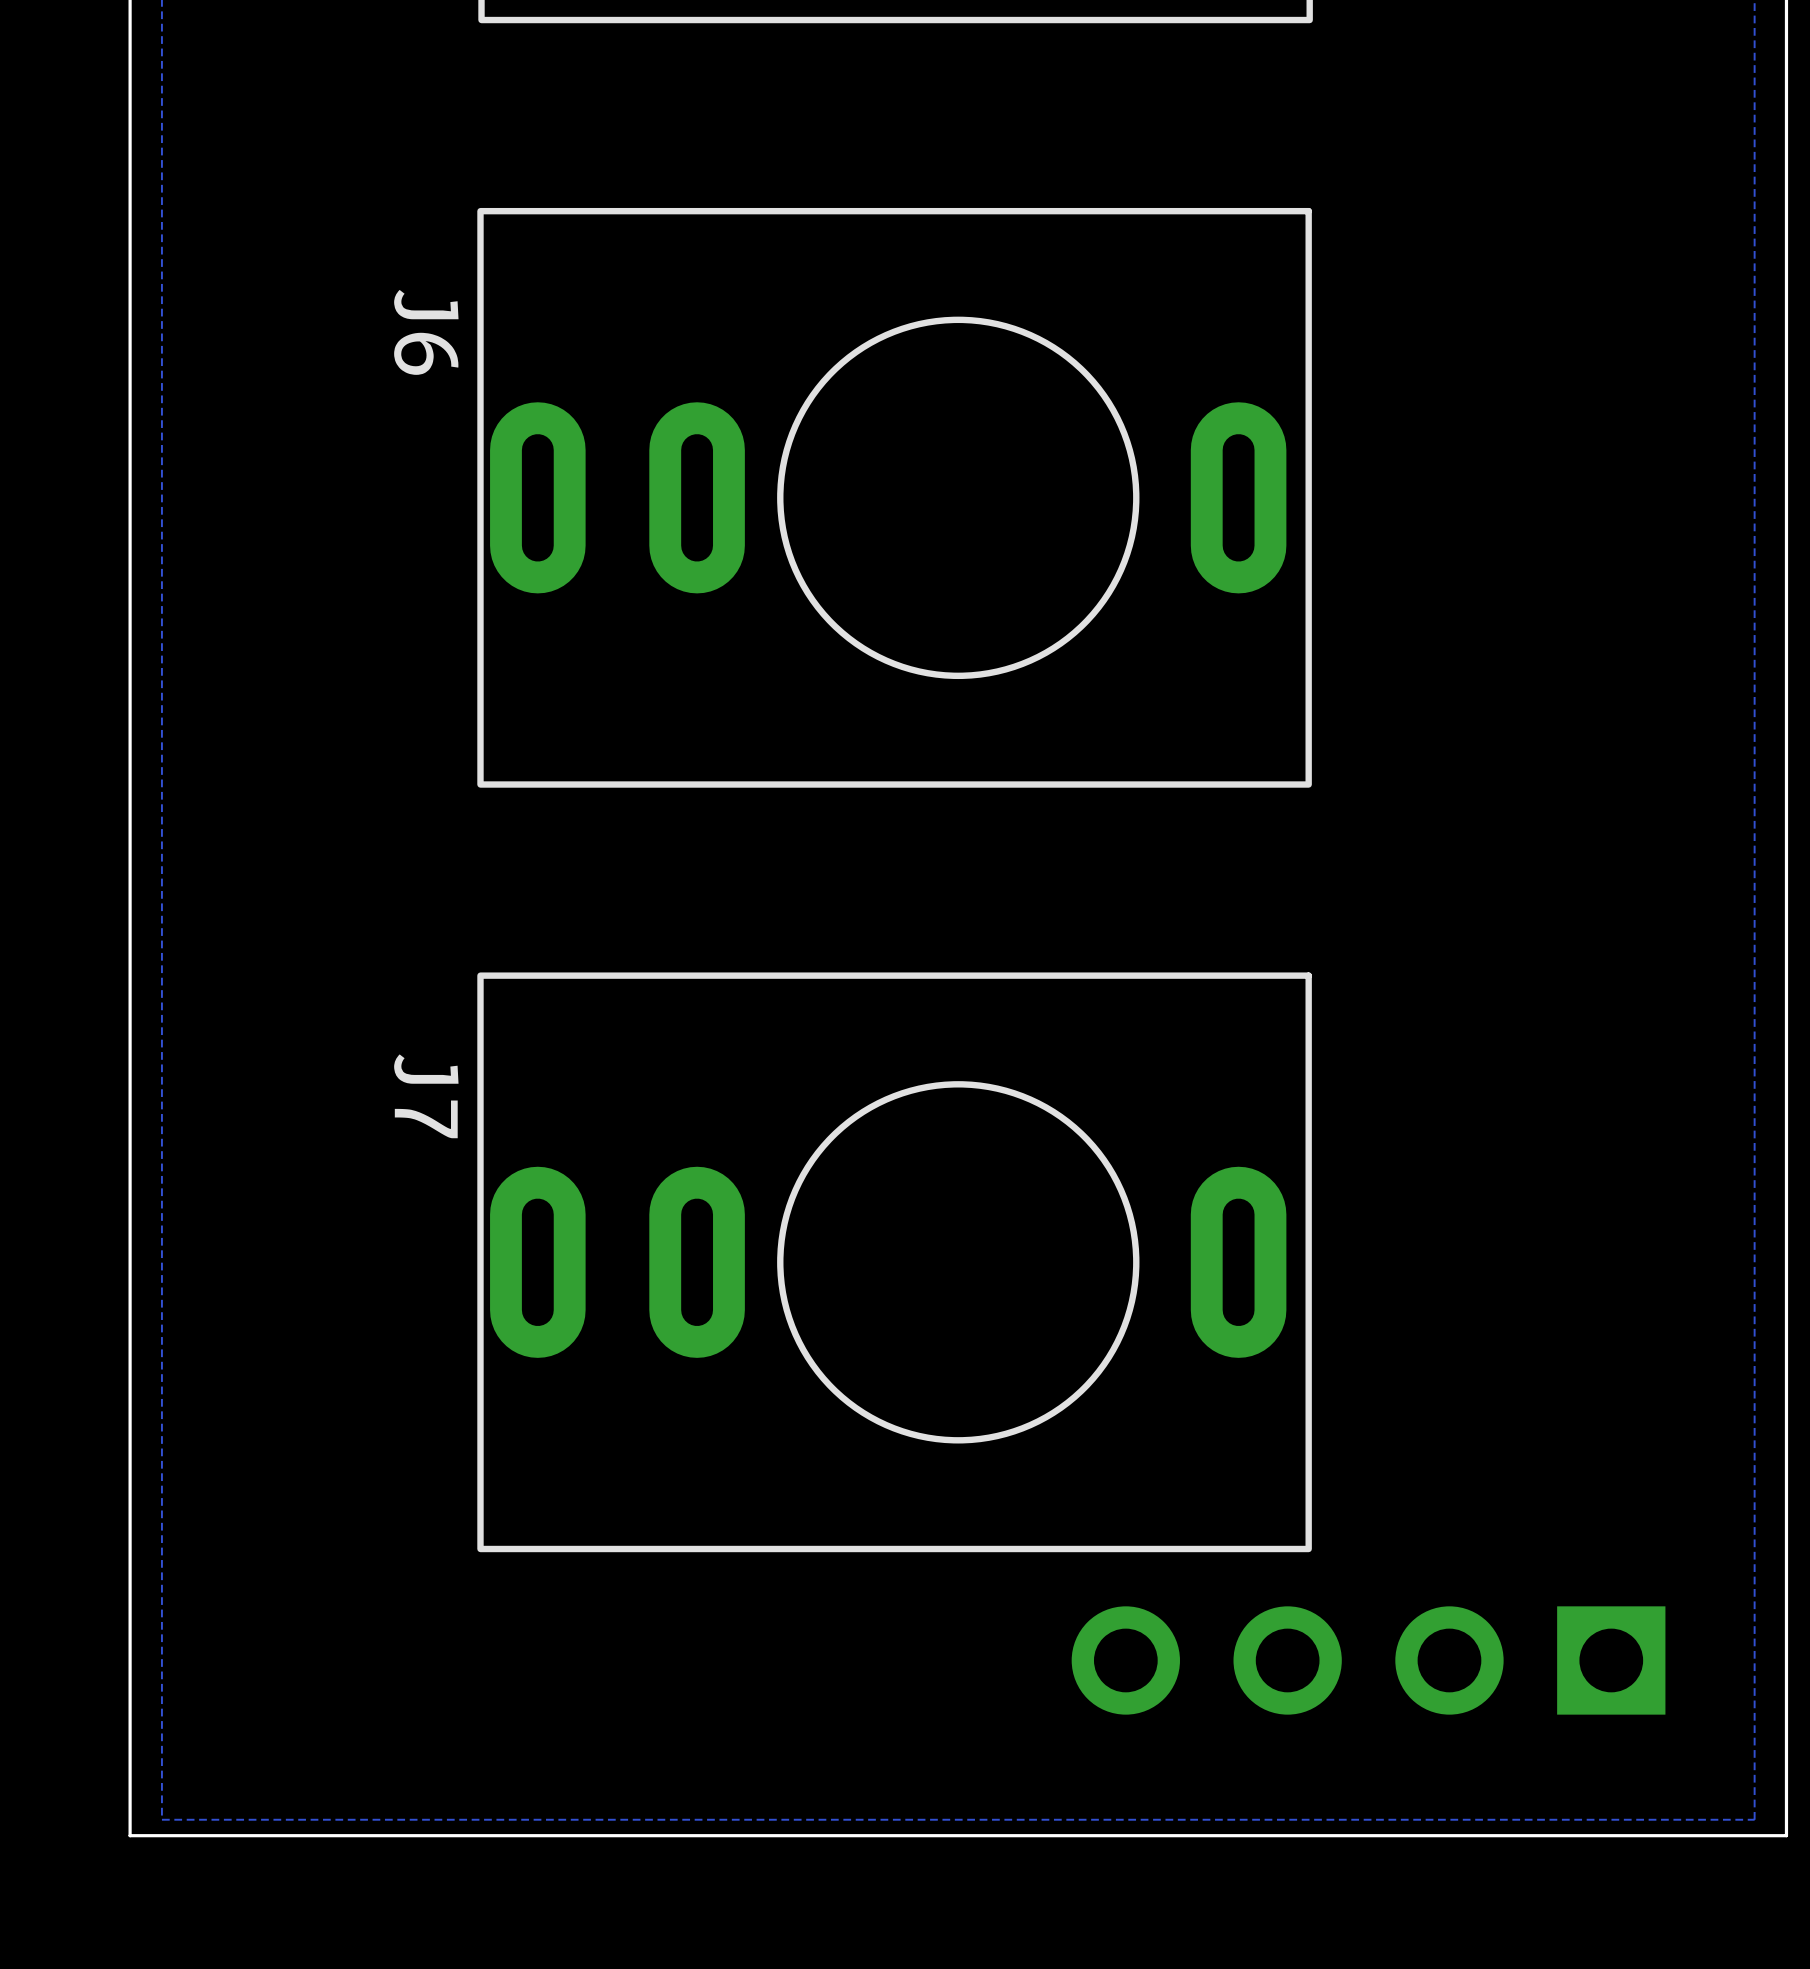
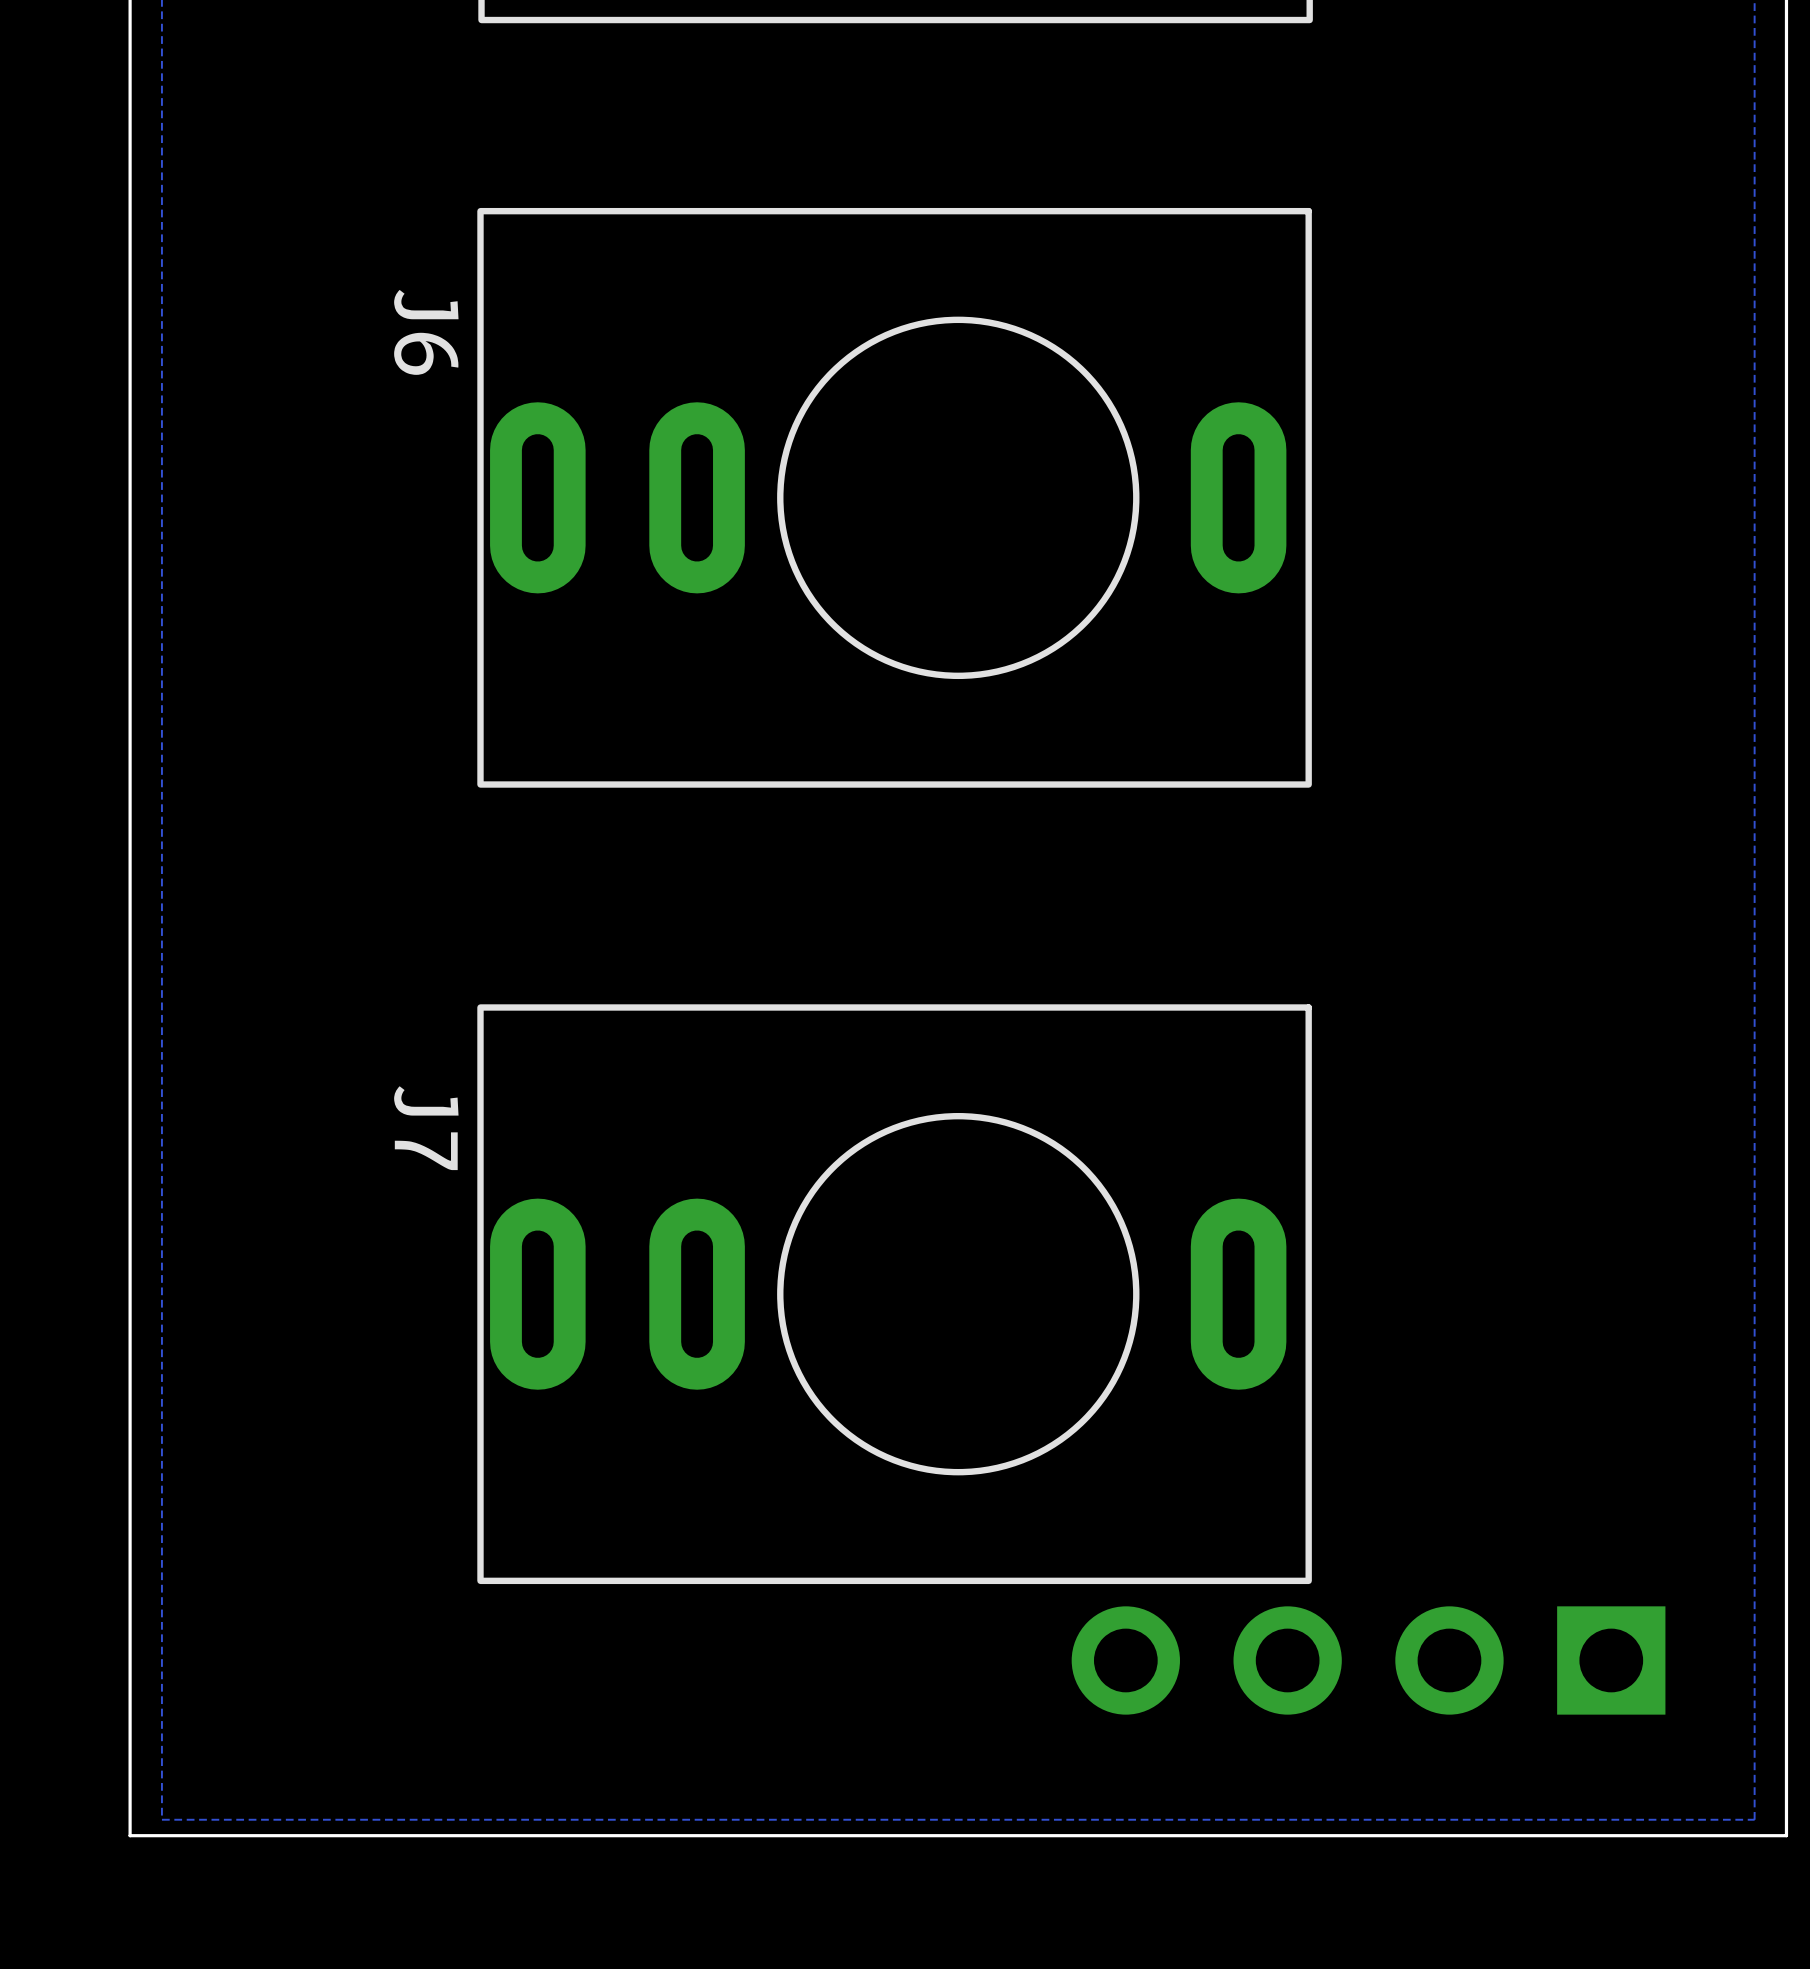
J7 position: (894, 1262) -> (894, 1294)

